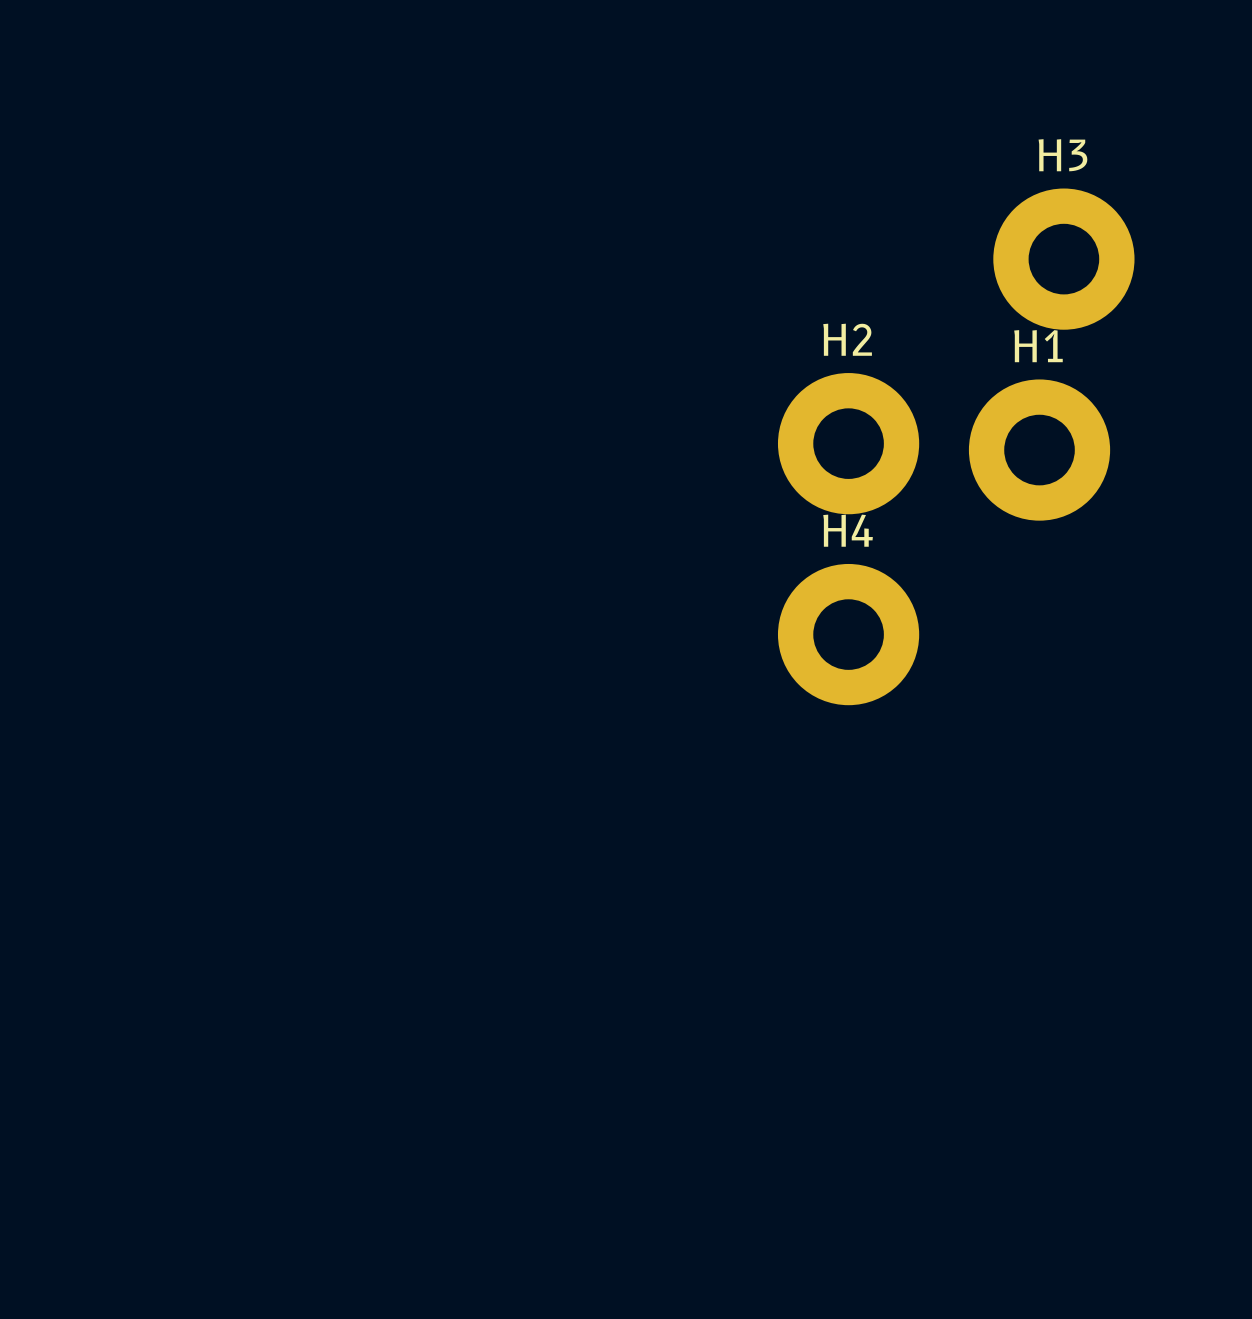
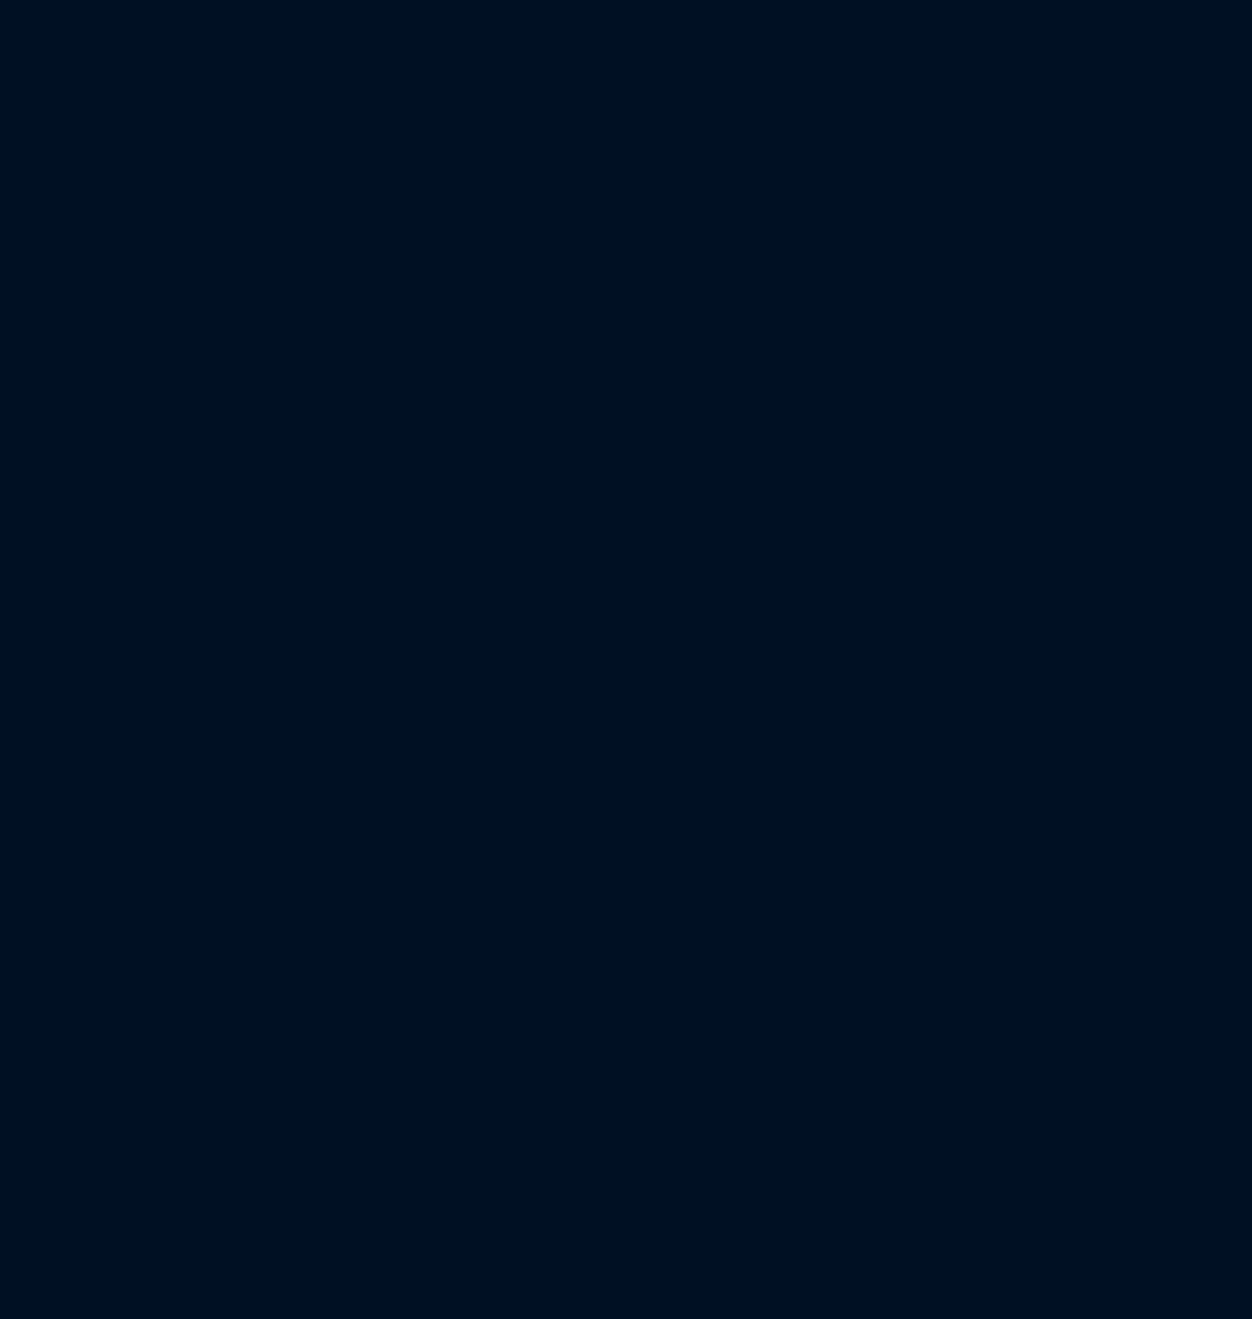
H3: (1063, 259) -> none
H2: (848, 443) -> none
H1: (1039, 450) -> none
H4: (848, 634) -> none

